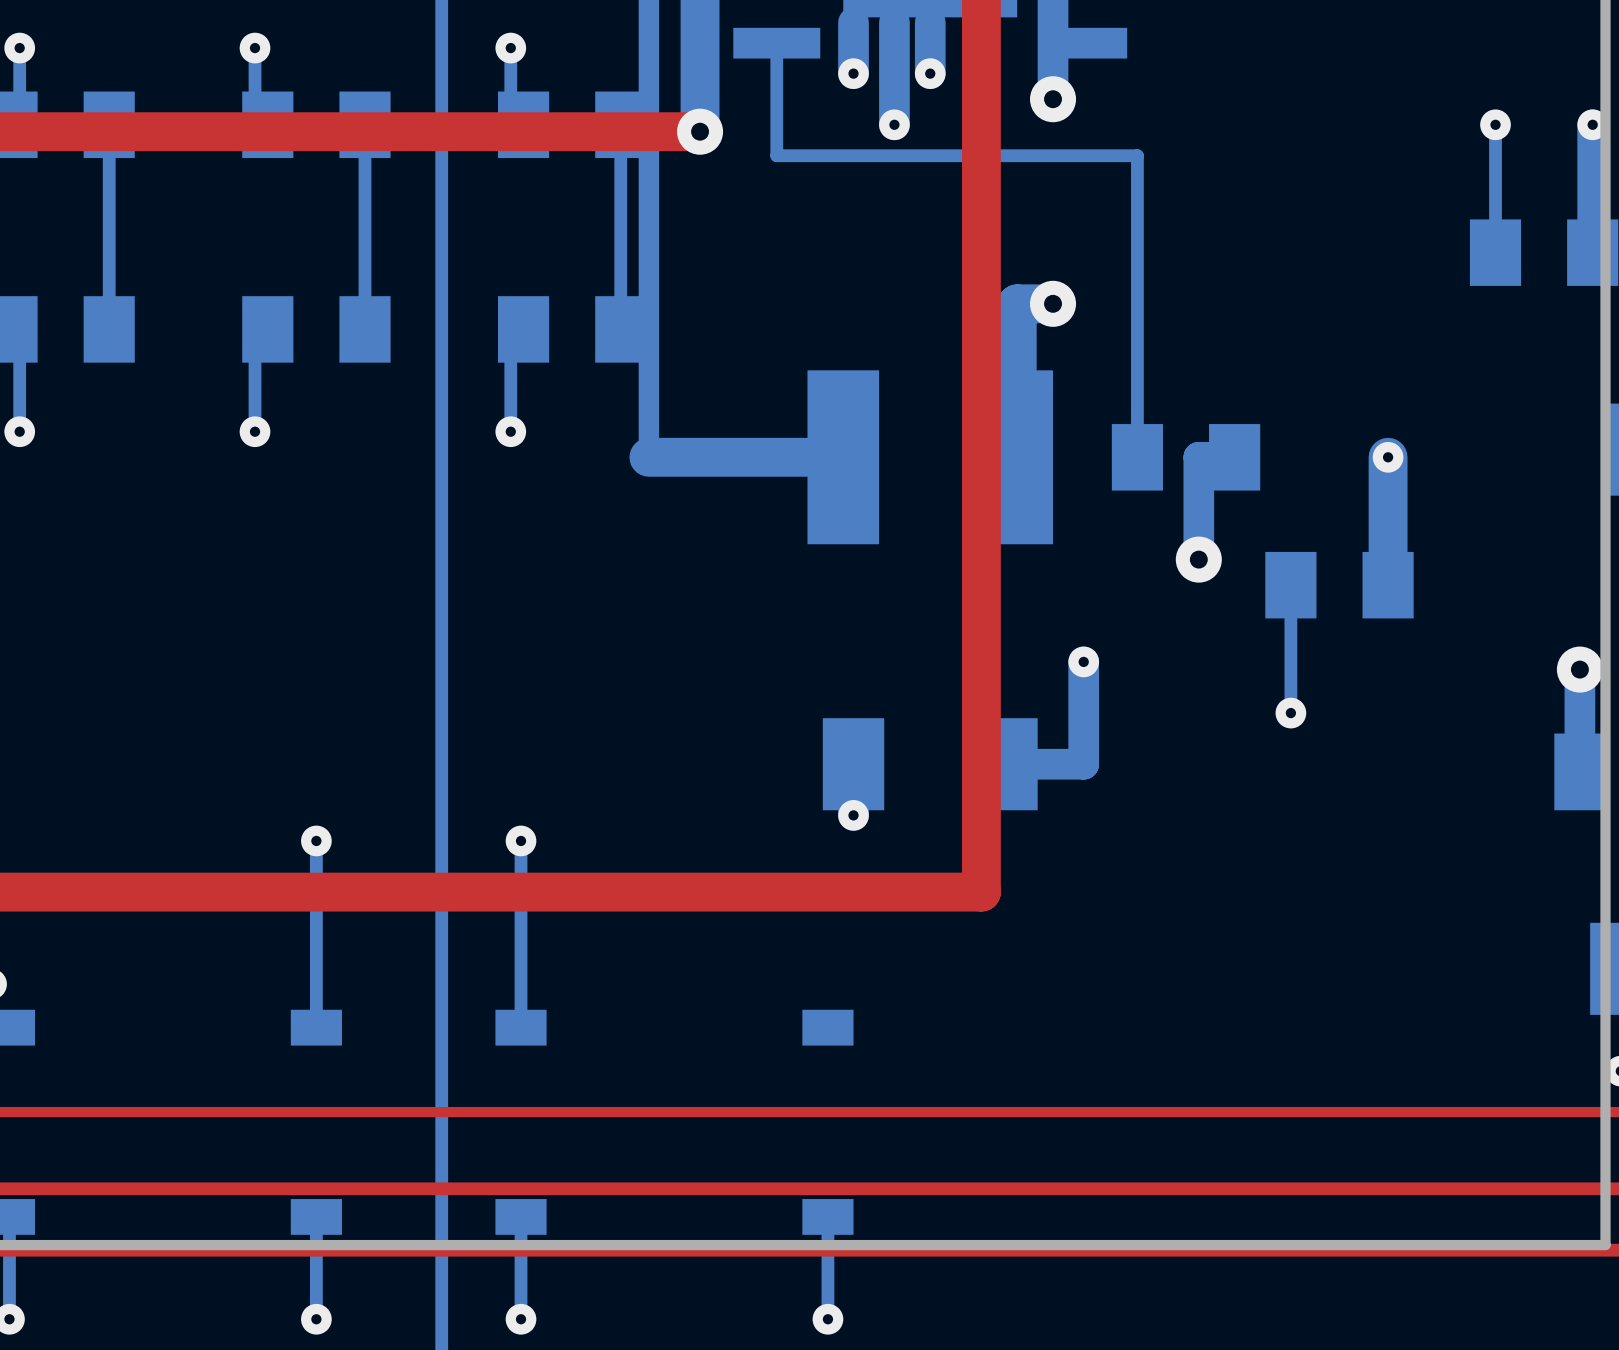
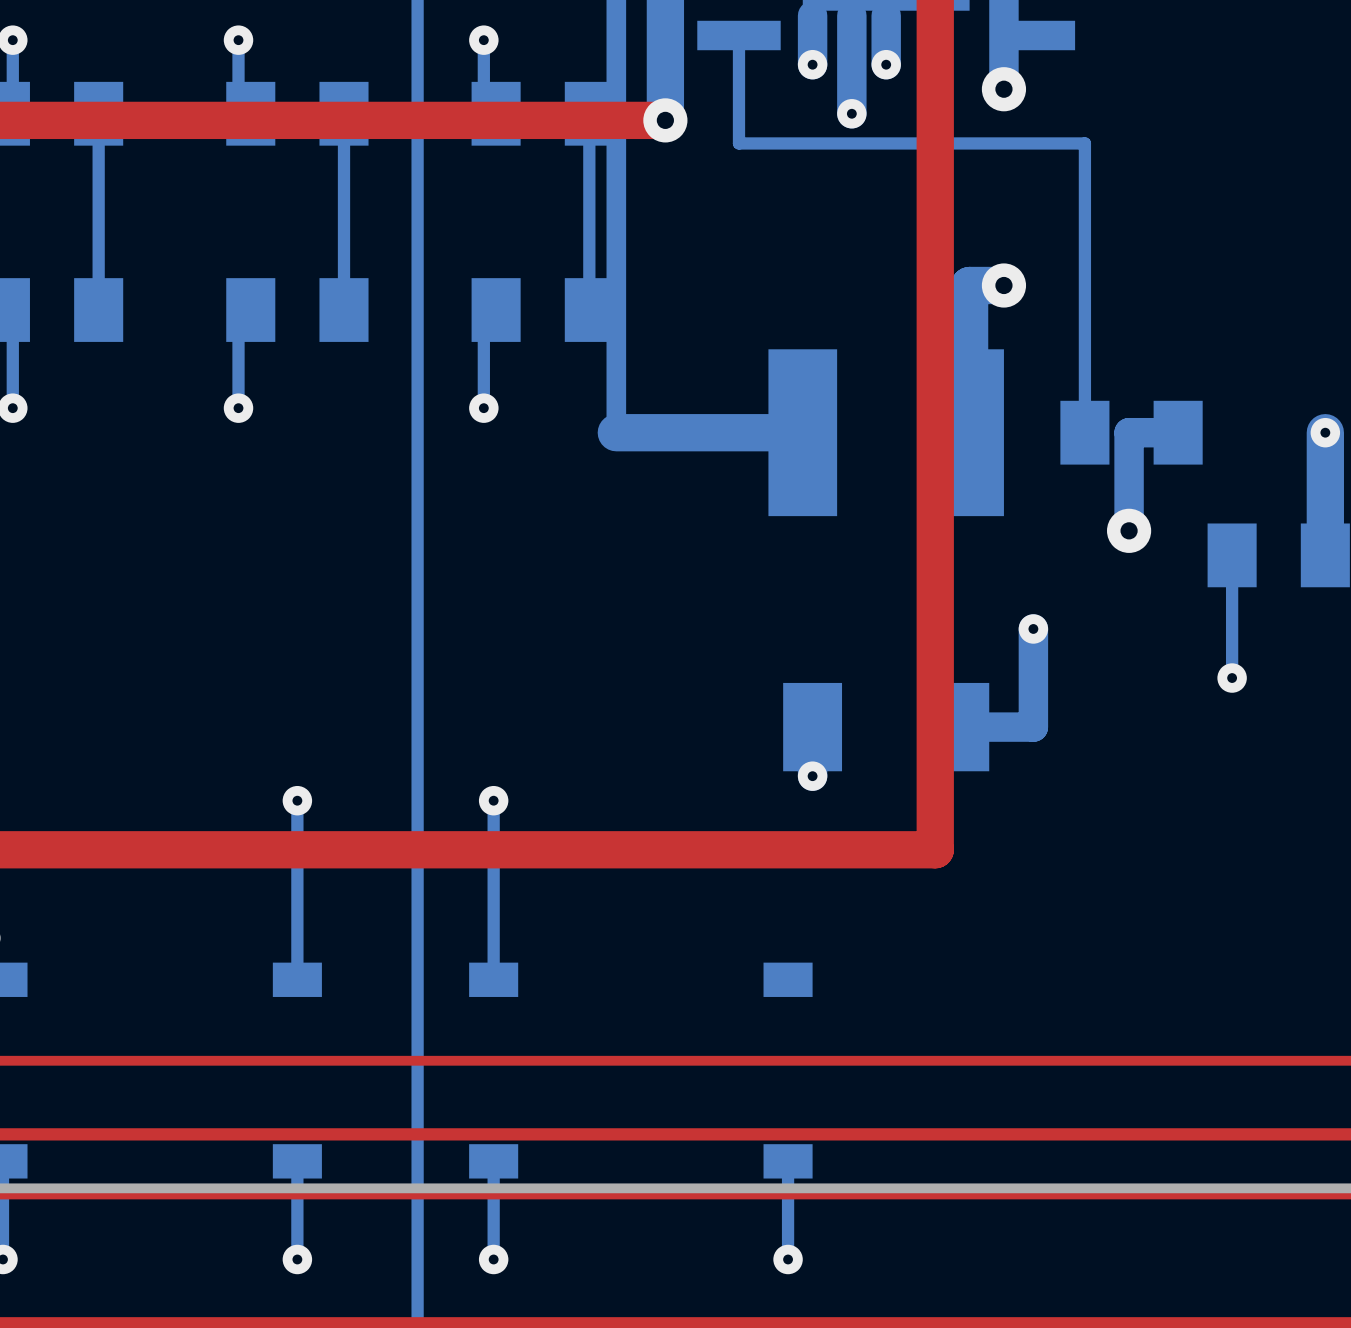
bottom track: (1198, 457) (1198, 559) -> (1143, 432) (1129, 432) (1129, 530)
via position: (1198, 559) -> (1129, 530)

